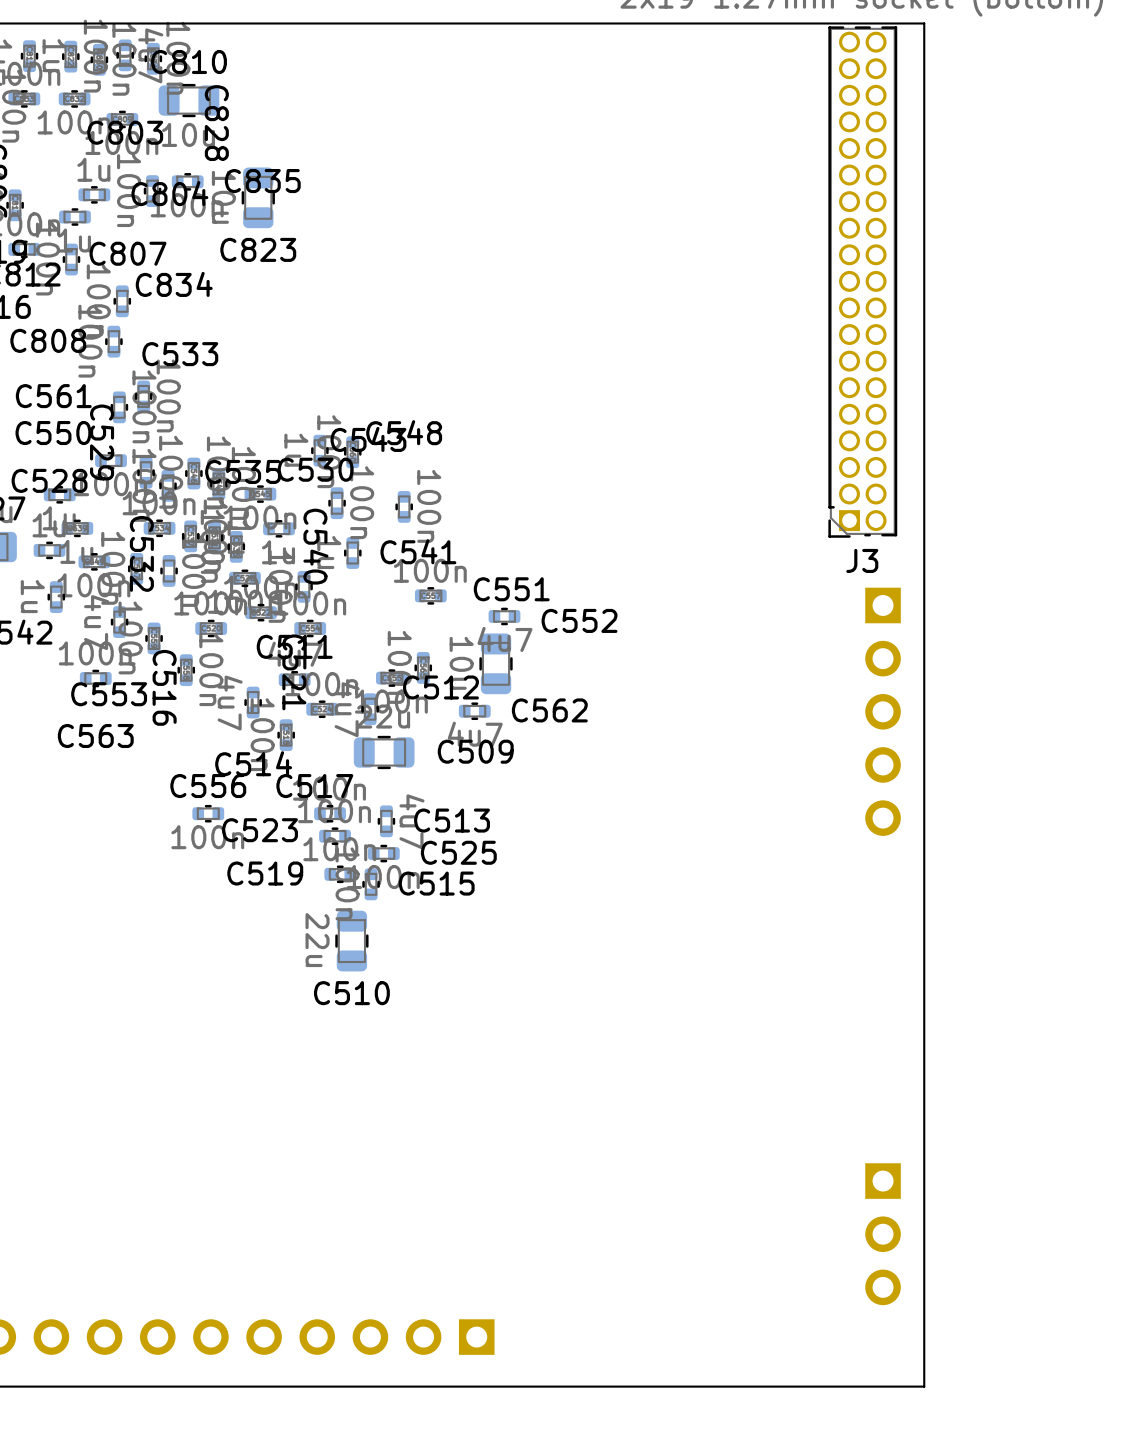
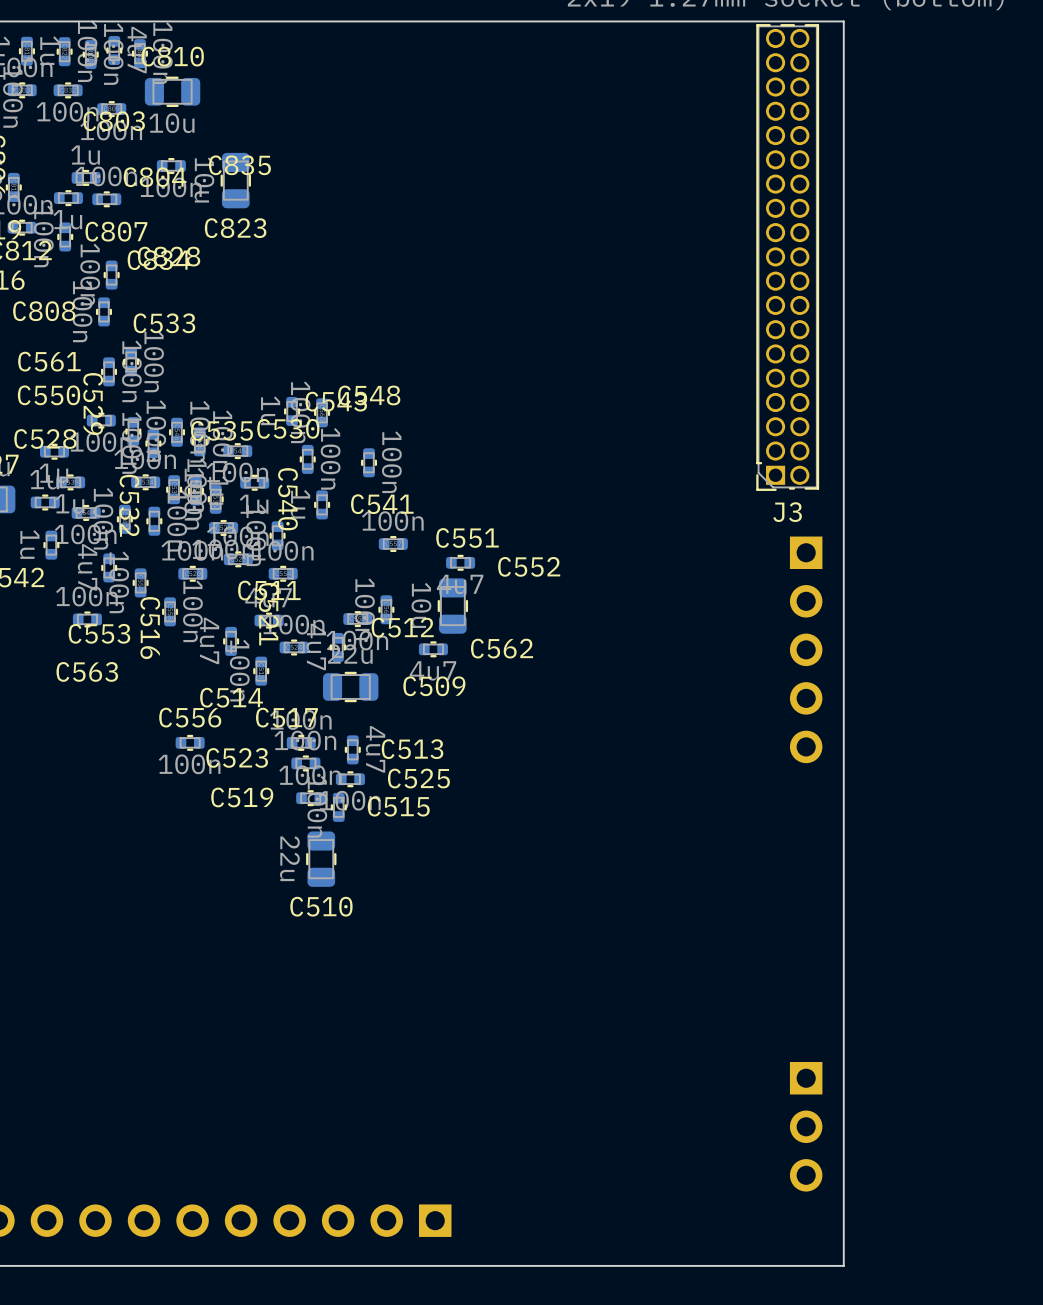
C828 rotation: 0° (152, 191) -> 90° clockwise (106, 199)
C828 position: (152, 191) -> (106, 199)

